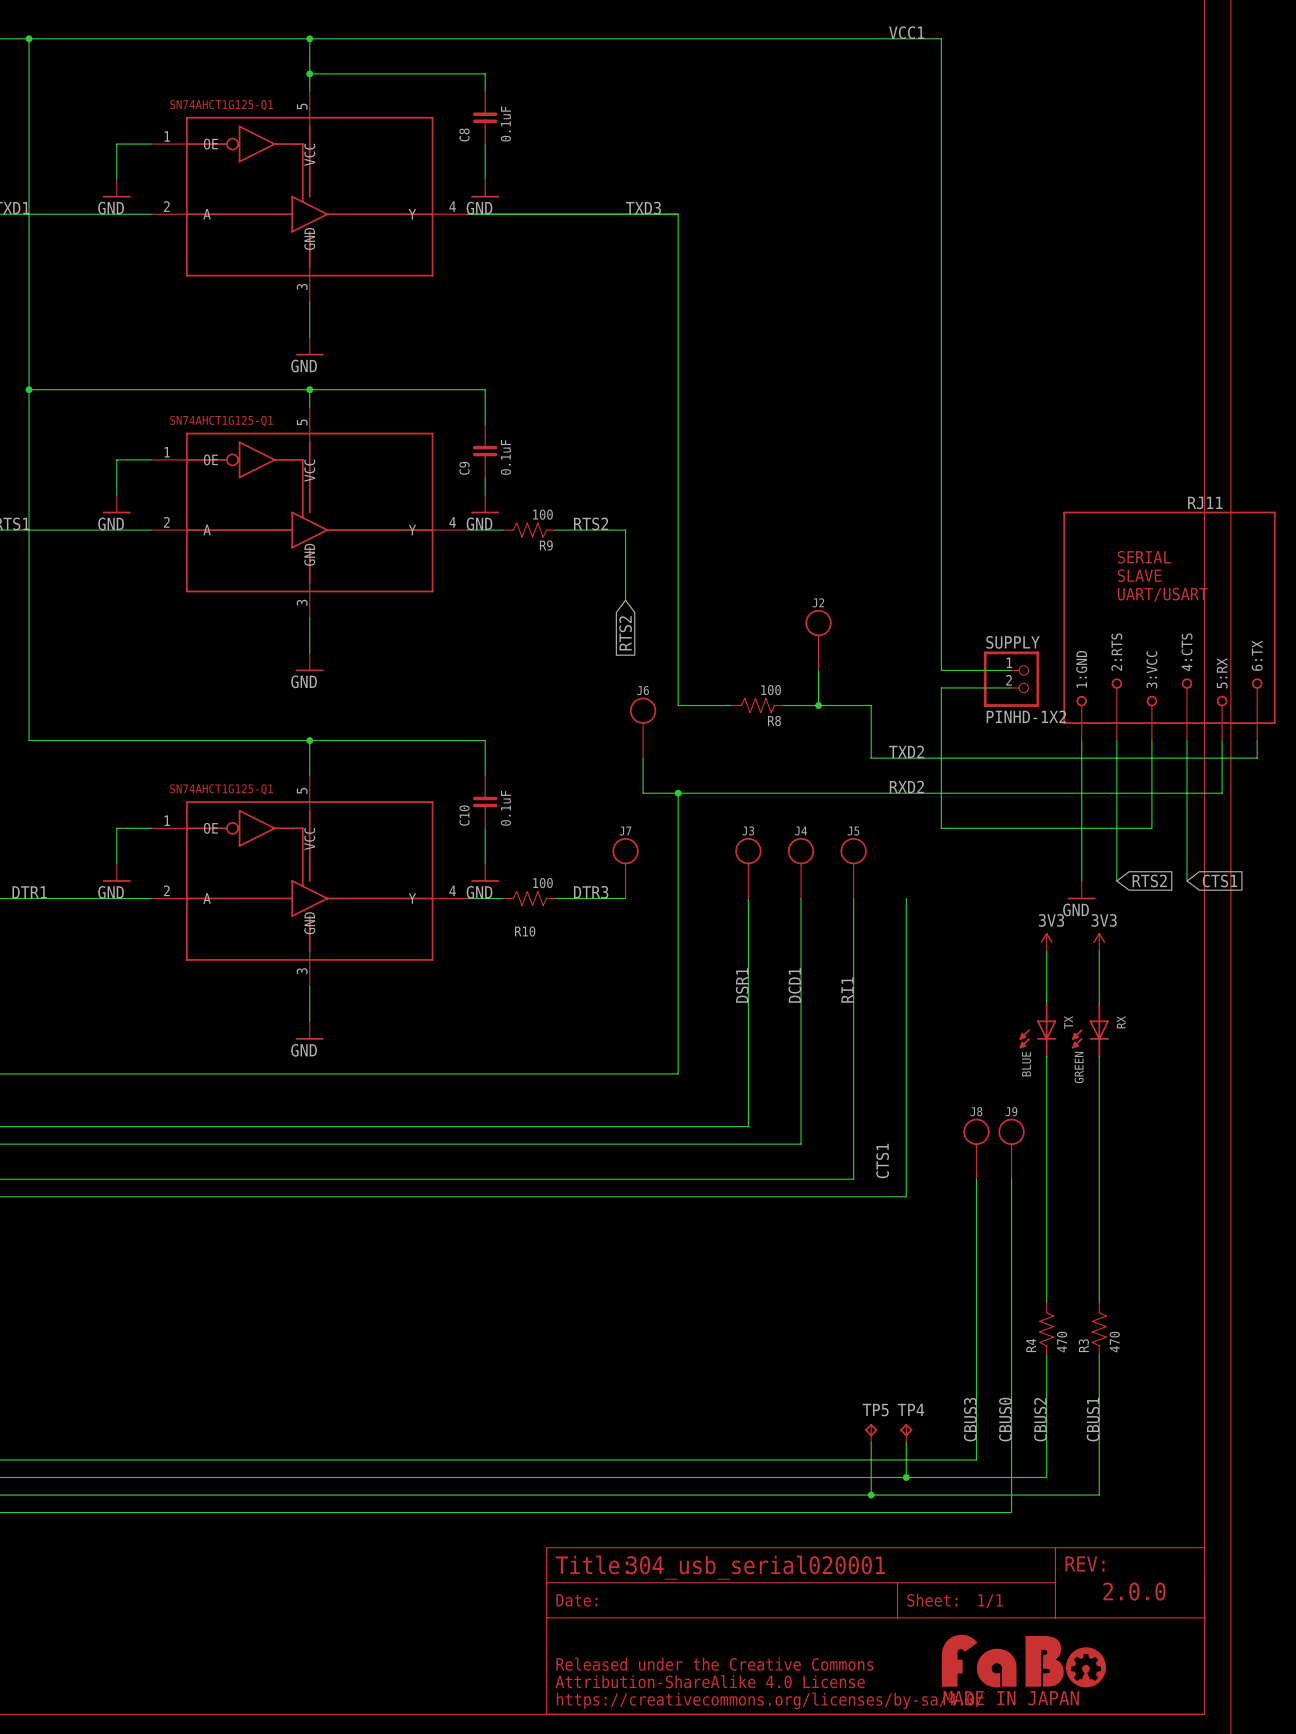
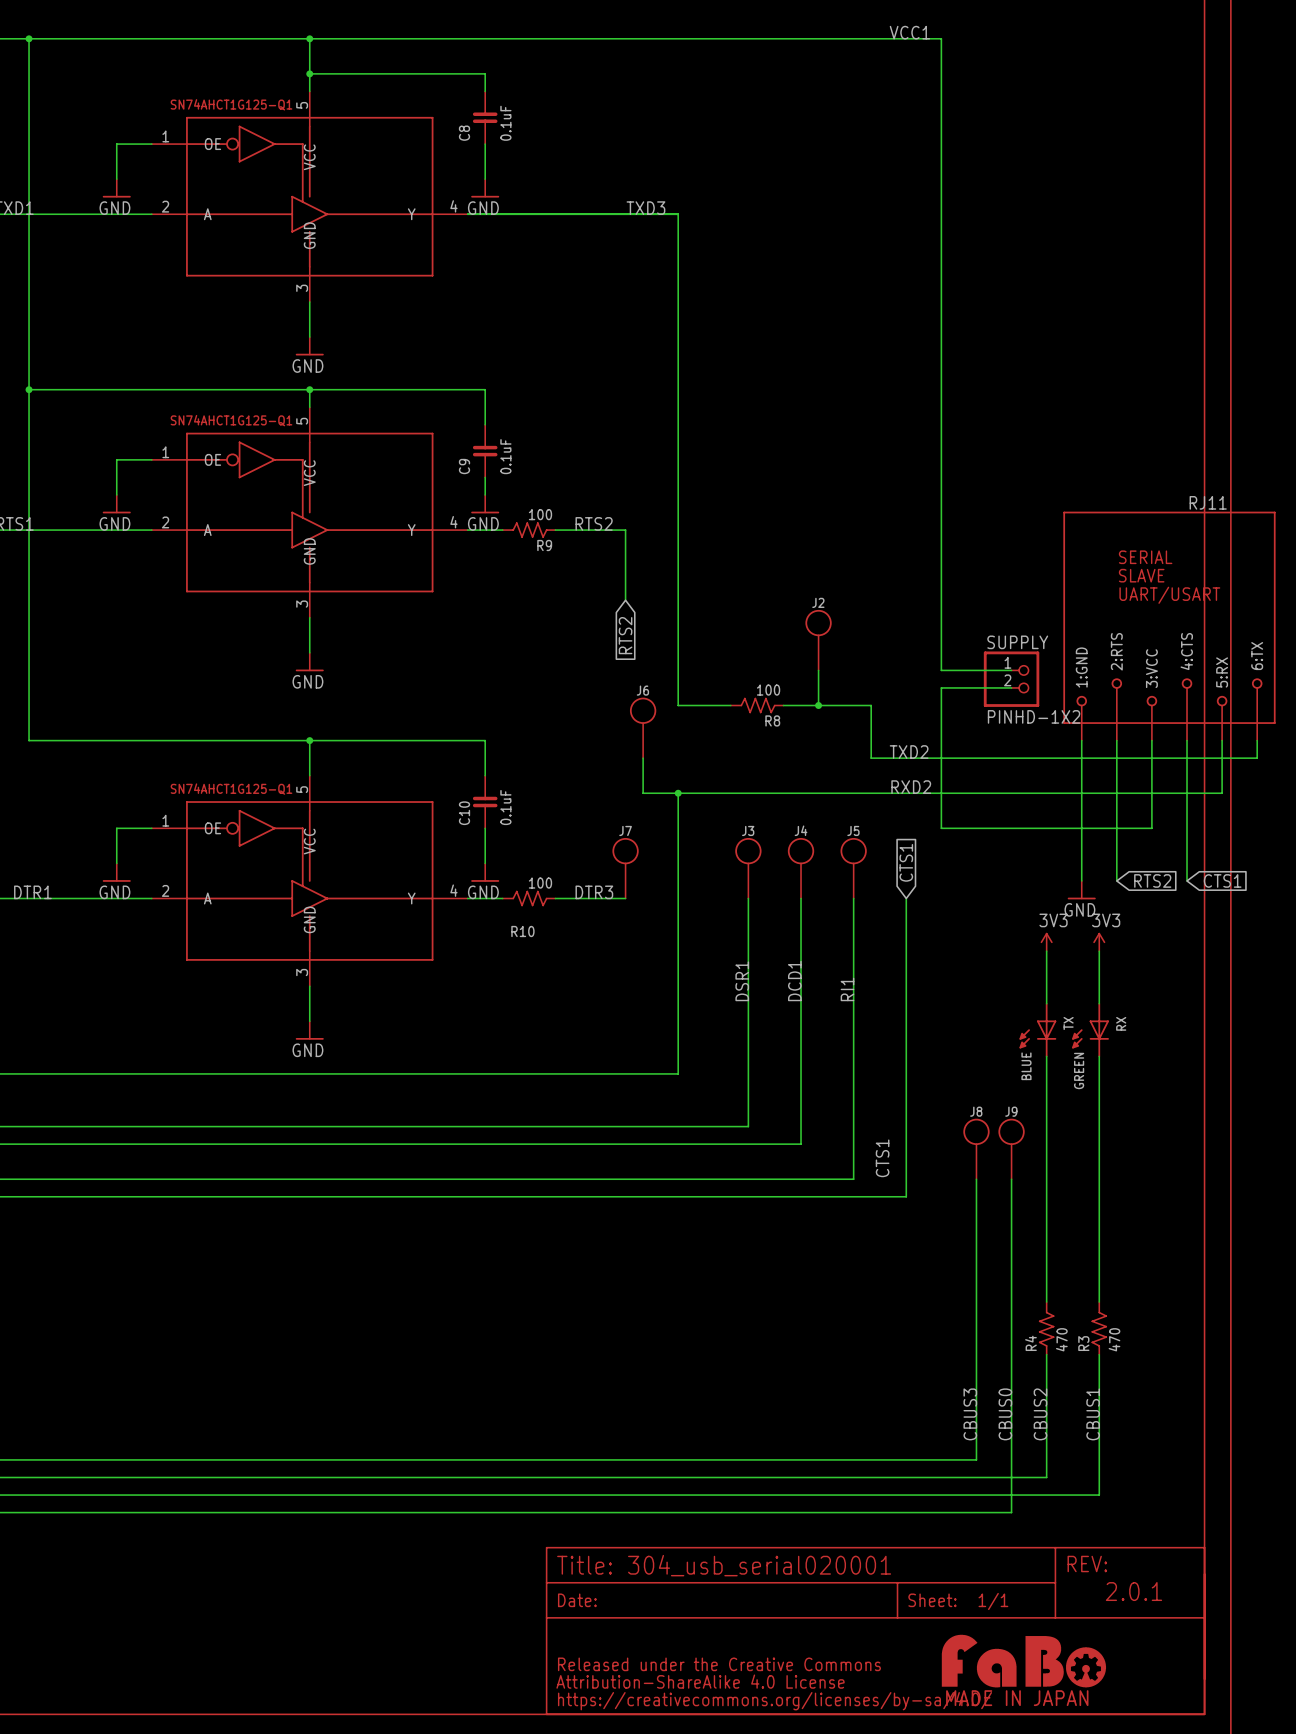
global label: none -> CTS1 (906, 862)
TP5: (871, 1433) -> none
TP4: (906, 1433) -> none
wire: (871, 1442) (871, 1495) -> none
wire: (906, 1442) (906, 1477) -> none
junction: (906, 1477) -> none
junction: (871, 1495) -> none
text: 2.0.0 (1134, 1591) -> 2.0.1 (1133, 1591)

